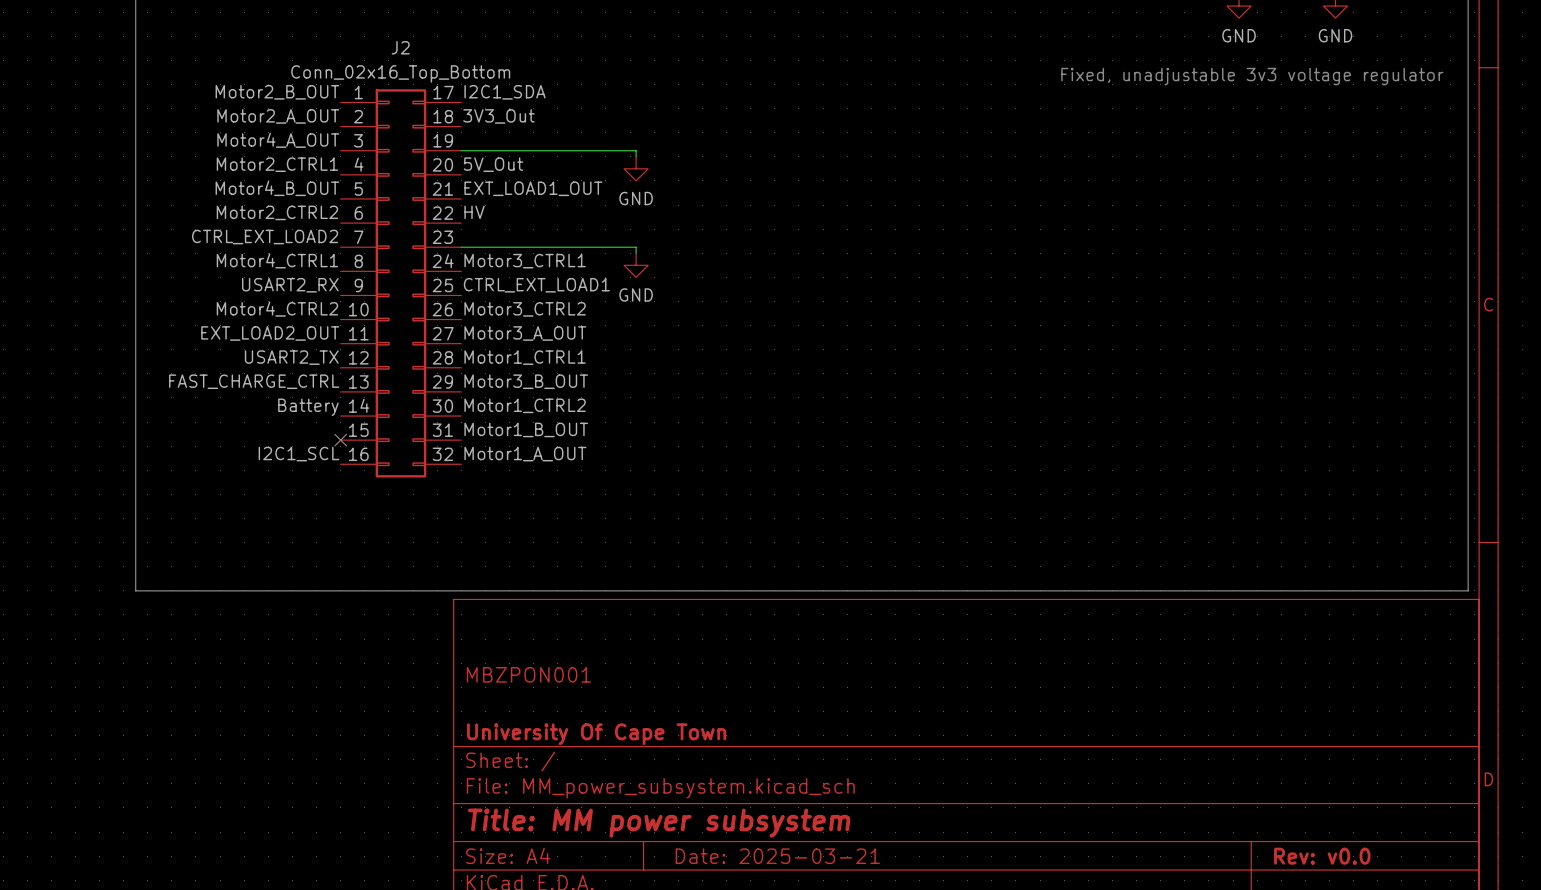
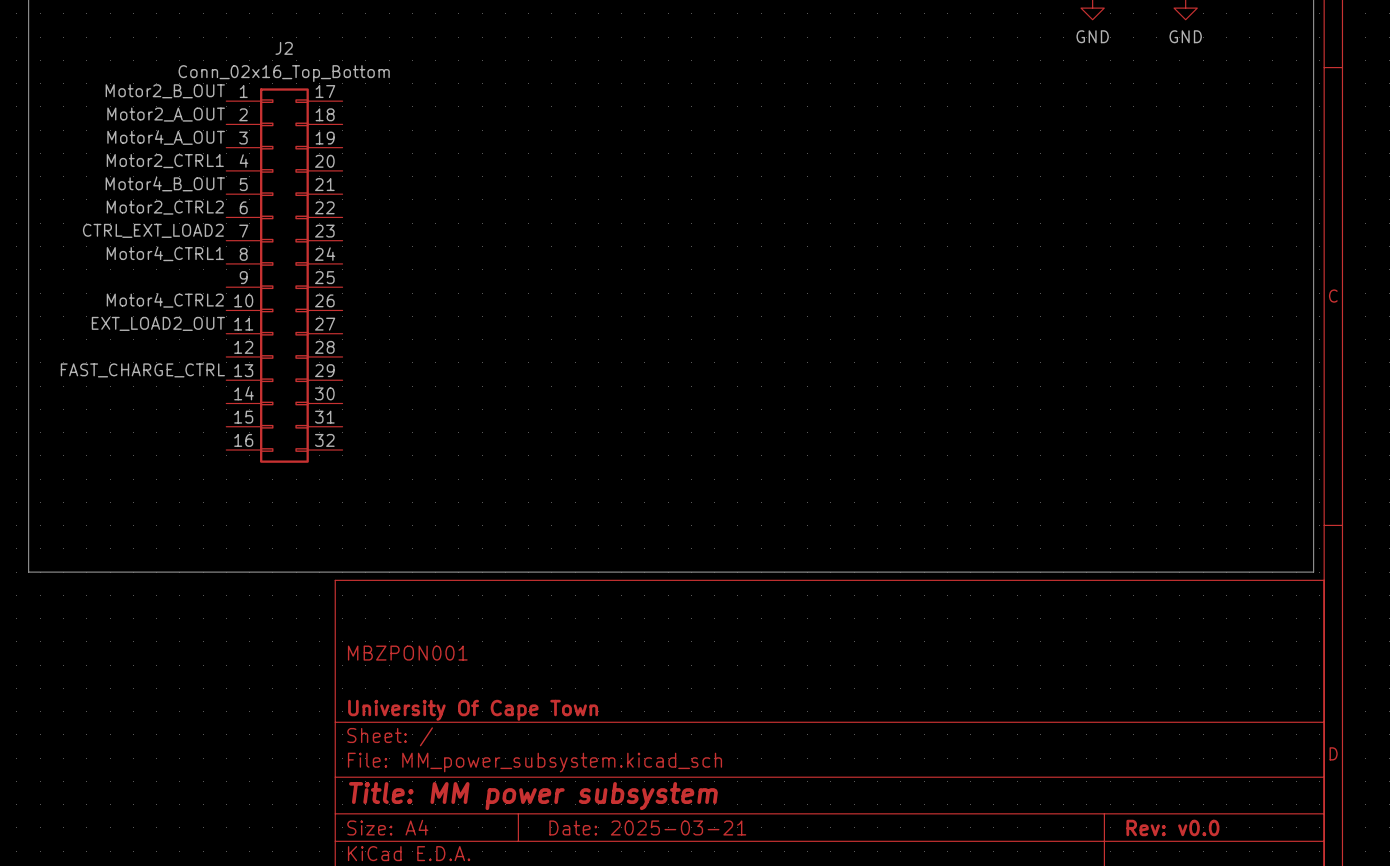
text: Fixed, unadjustable 3v3 voltage regulator (1252, 76) -> none
label: I2C1_SDA (505, 92) -> none
label: 3V3_Out (498, 116) -> none
wire: (461, 150) (636, 150) (636, 156) -> none
label: 5V_Out (493, 164) -> none
power symbol: GND (636, 168) -> none
label: EXT_LOAD1_OUT (533, 188) -> none
label: HV (474, 212) -> none
wire: (461, 247) (636, 247) (636, 253) -> none
label: Motor3_CTRL1 (525, 261) -> none
power symbol: GND (636, 265) -> none
label: USART2_RX (290, 285) -> none
label: CTRL_EXT_LOAD1 (536, 285) -> none
label: Motor3_CTRL2 (525, 309) -> none
label: Motor3_A_OUT (525, 333) -> none
label: USART2_TX (291, 357) -> none
label: Motor1_CTRL1 (525, 357) -> none
label: Motor3_B_OUT (526, 381) -> none
label: Motor1_CTRL2 (525, 405) -> none
label: Battery (308, 407) -> none
label: Motor1_B_OUT (526, 429) -> none
no-connect mark: (340, 440) -> none
label: I2C1_SCL (298, 454) -> none
label: Motor1_A_OUT (525, 454) -> none

